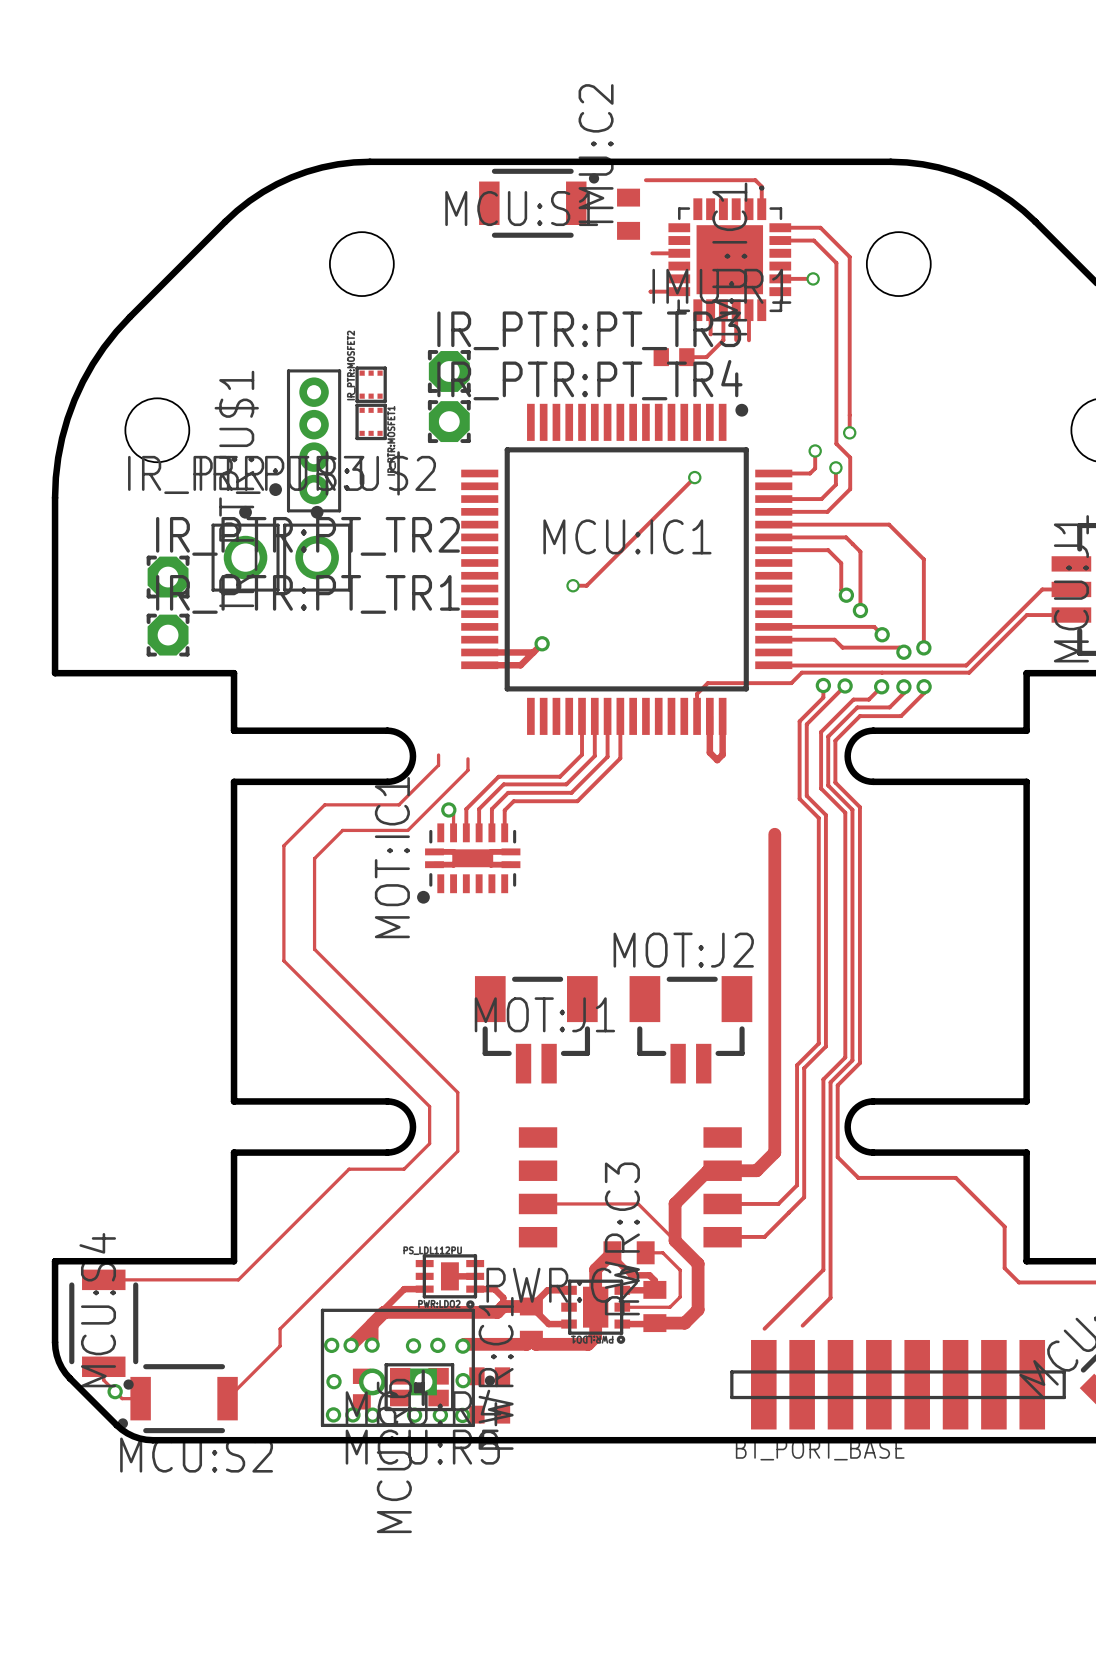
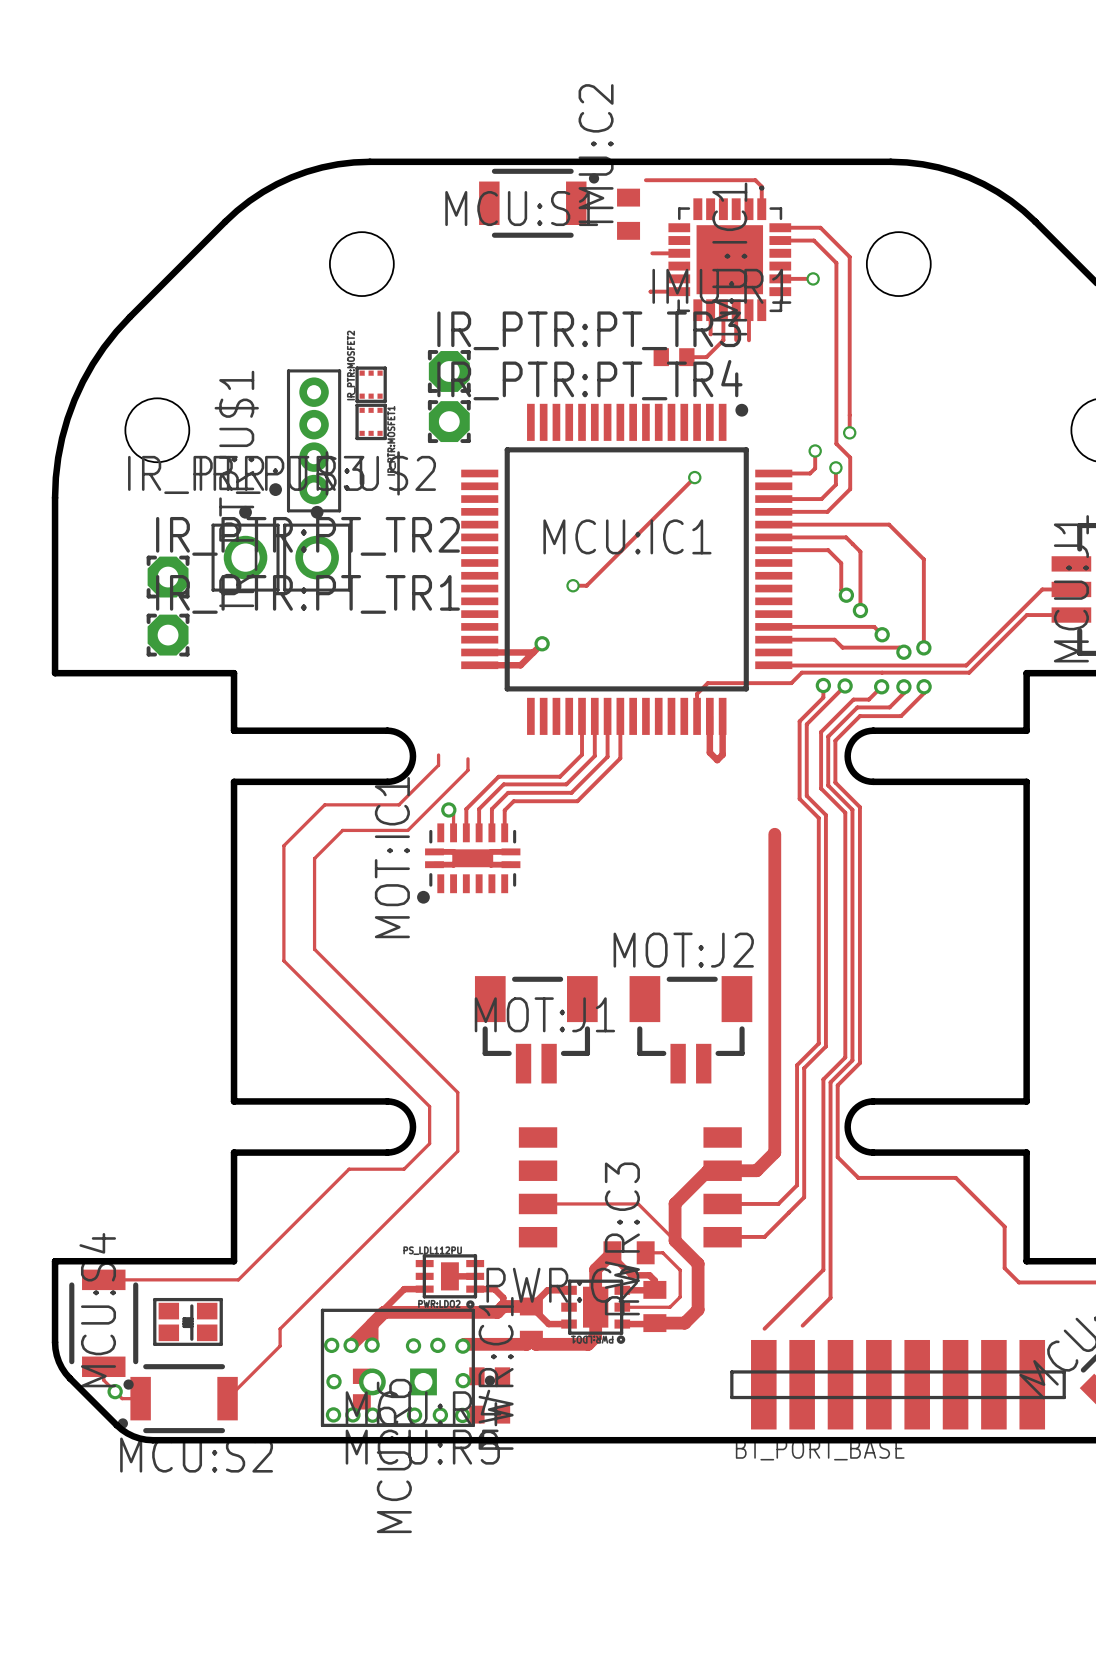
part position: (419, 1387) -> (188, 1321)

